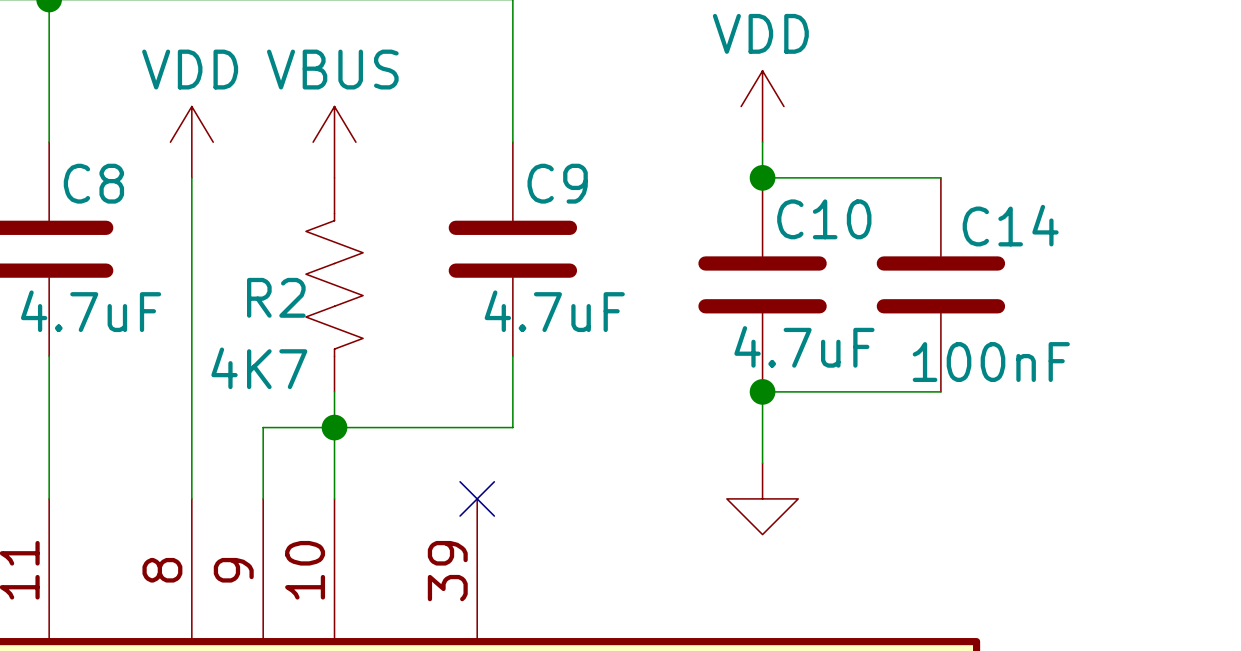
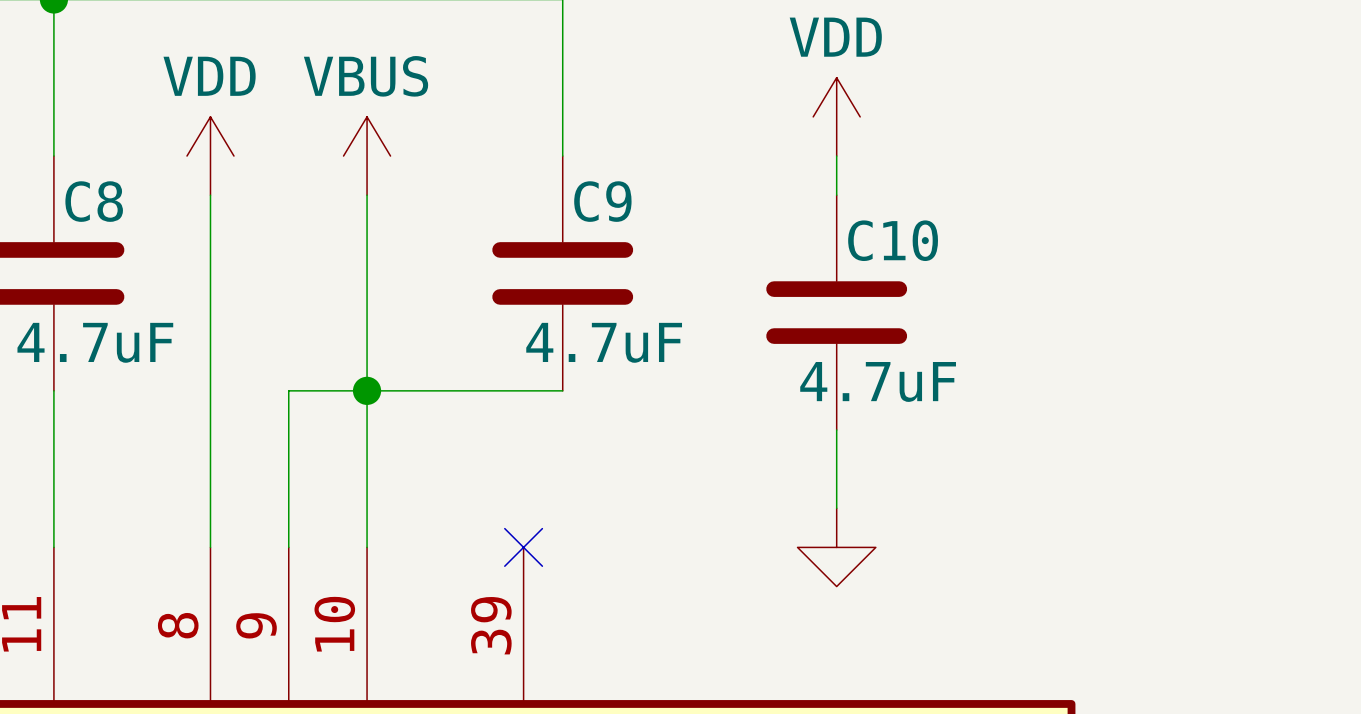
wire: none -> (367, 195) (367, 430)
wire: (762, 177) (940, 177) -> none
junction: (762, 177) -> none
R2: 4K7 (334, 284) -> none
C14: 100nF (940, 284) -> none
wire: (512, 356) (512, 427) (263, 427) -> (562, 390) (288, 390) (288, 469)
wire: (762, 391) (940, 391) -> none
junction: (762, 391) -> none
junction position: (334, 427) -> (367, 390)

